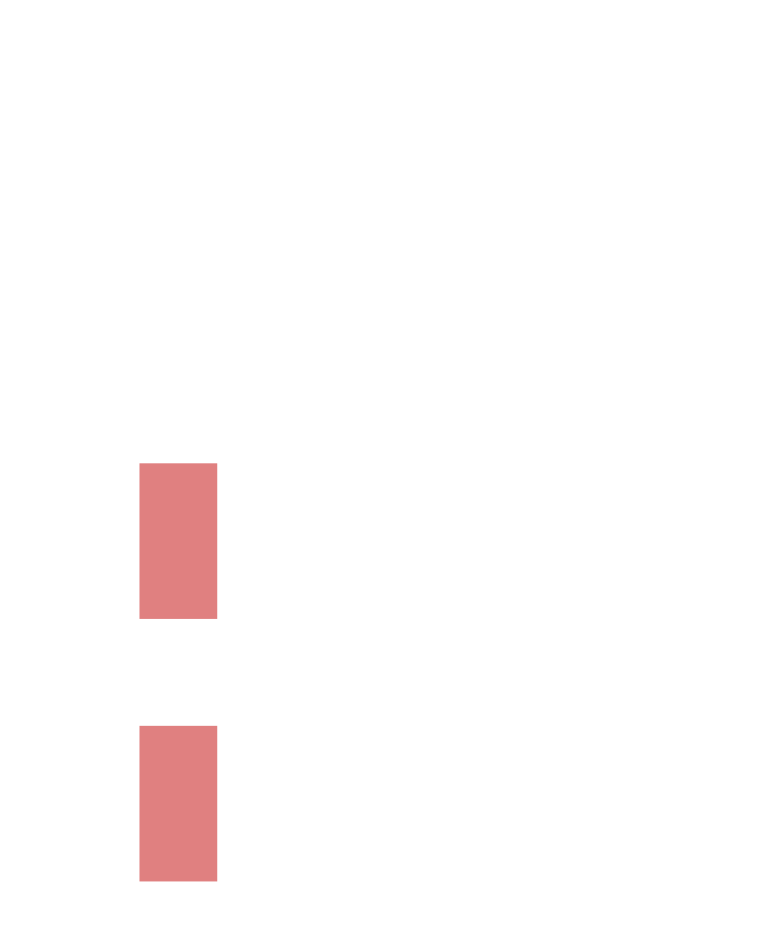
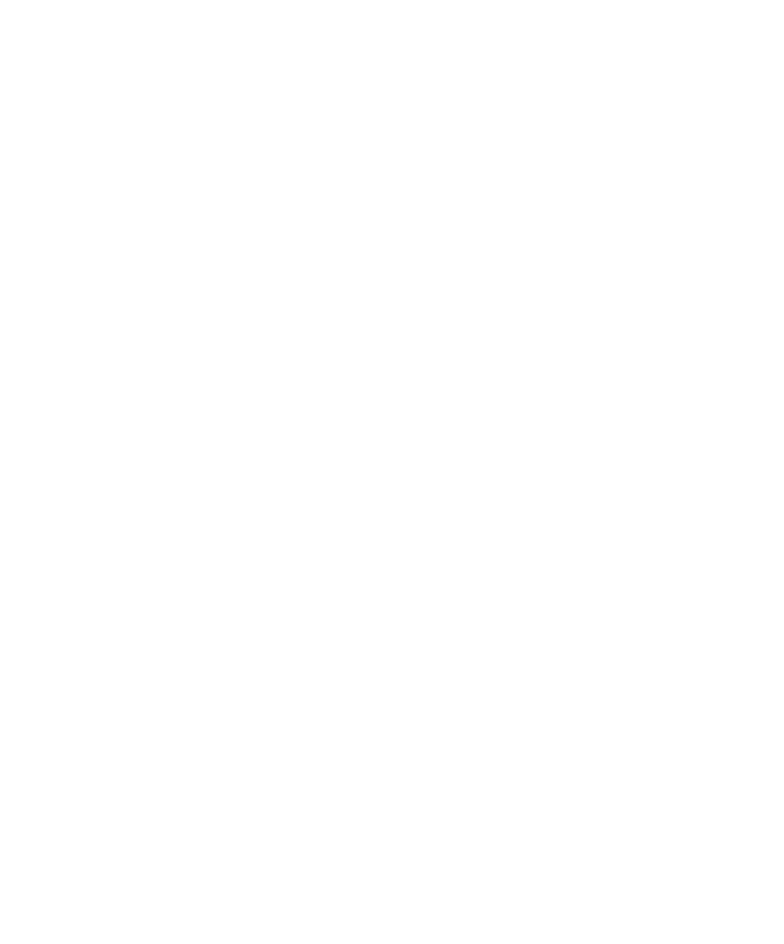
part: (178, 672) -> none

